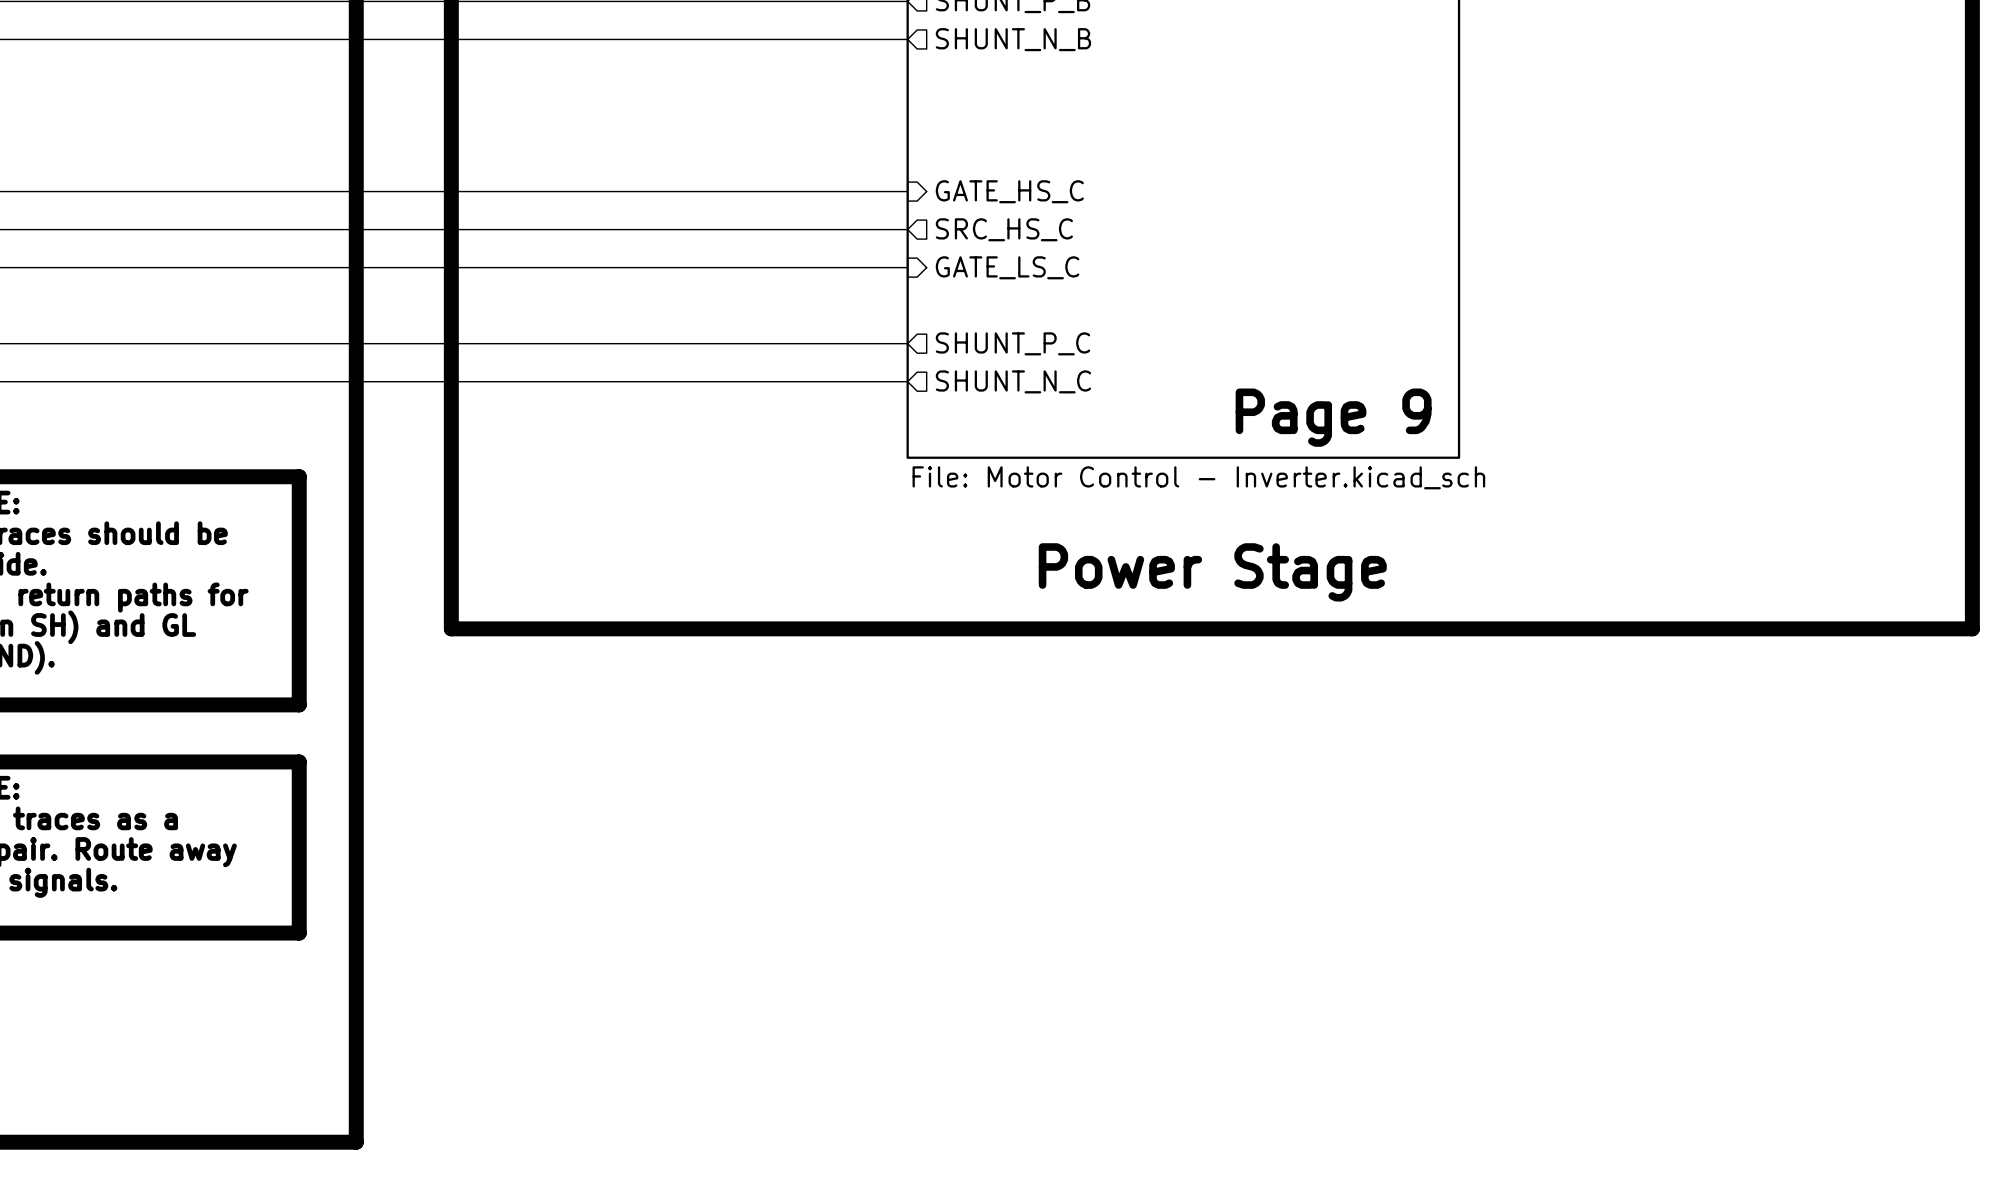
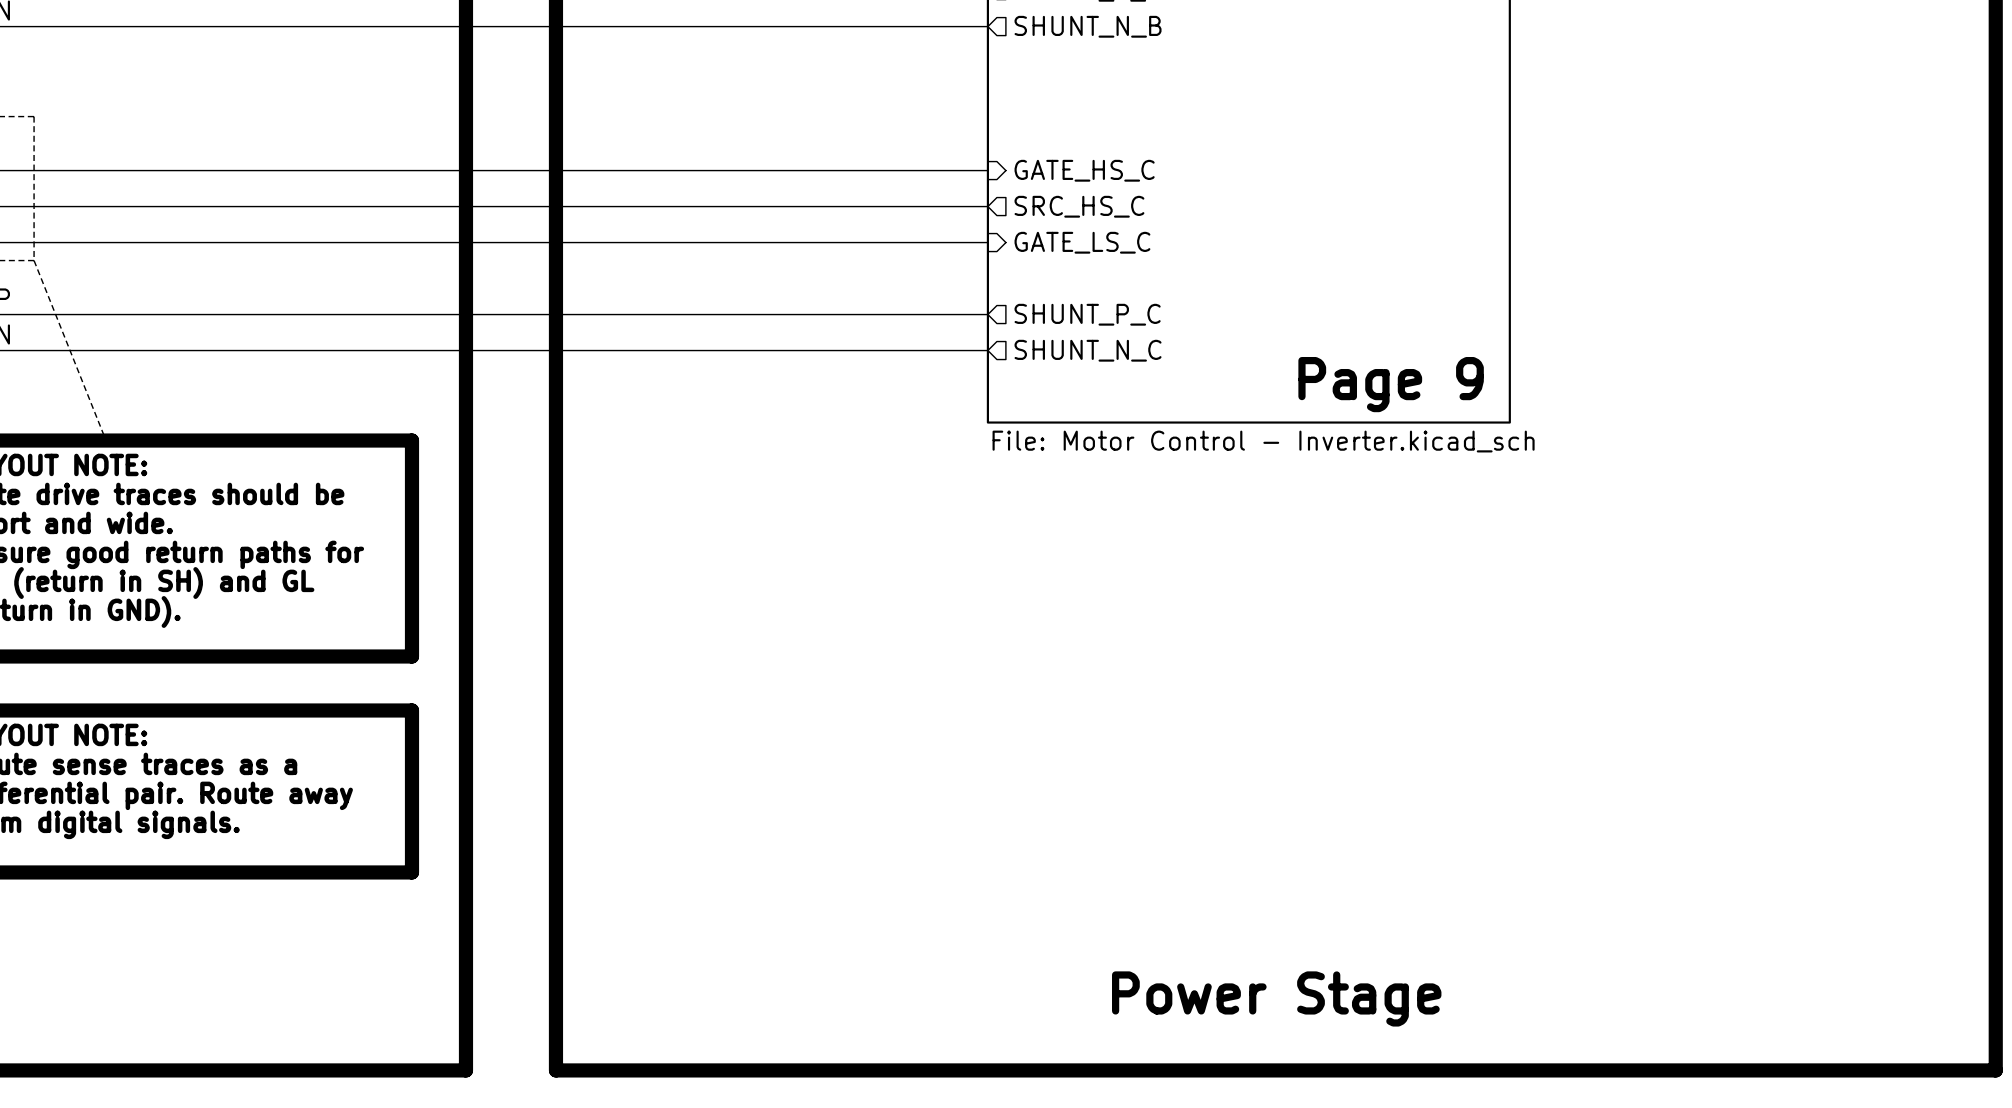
text: Power Stage (1212, 572) -> none
line: (451, 628) (1972, 628) -> (555, 584) (555, 1070) (1995, 1070) (1995, 584)
text: none -> Power Stage (1276, 998)

